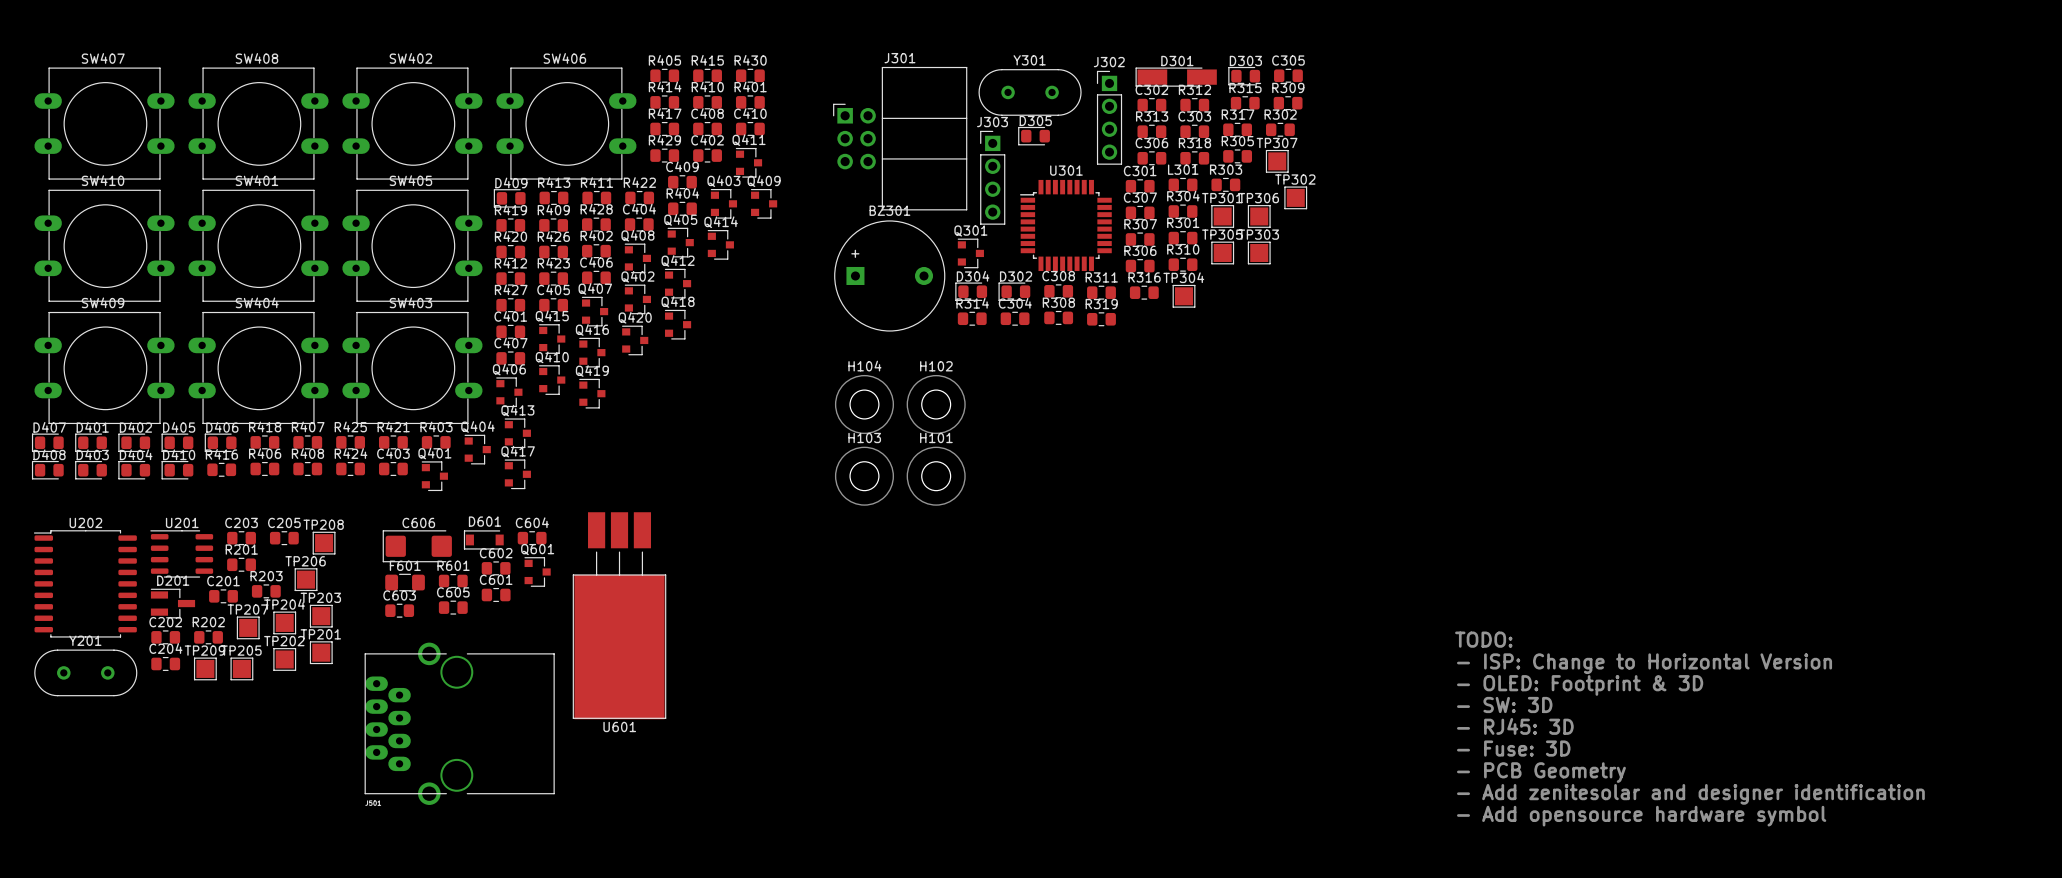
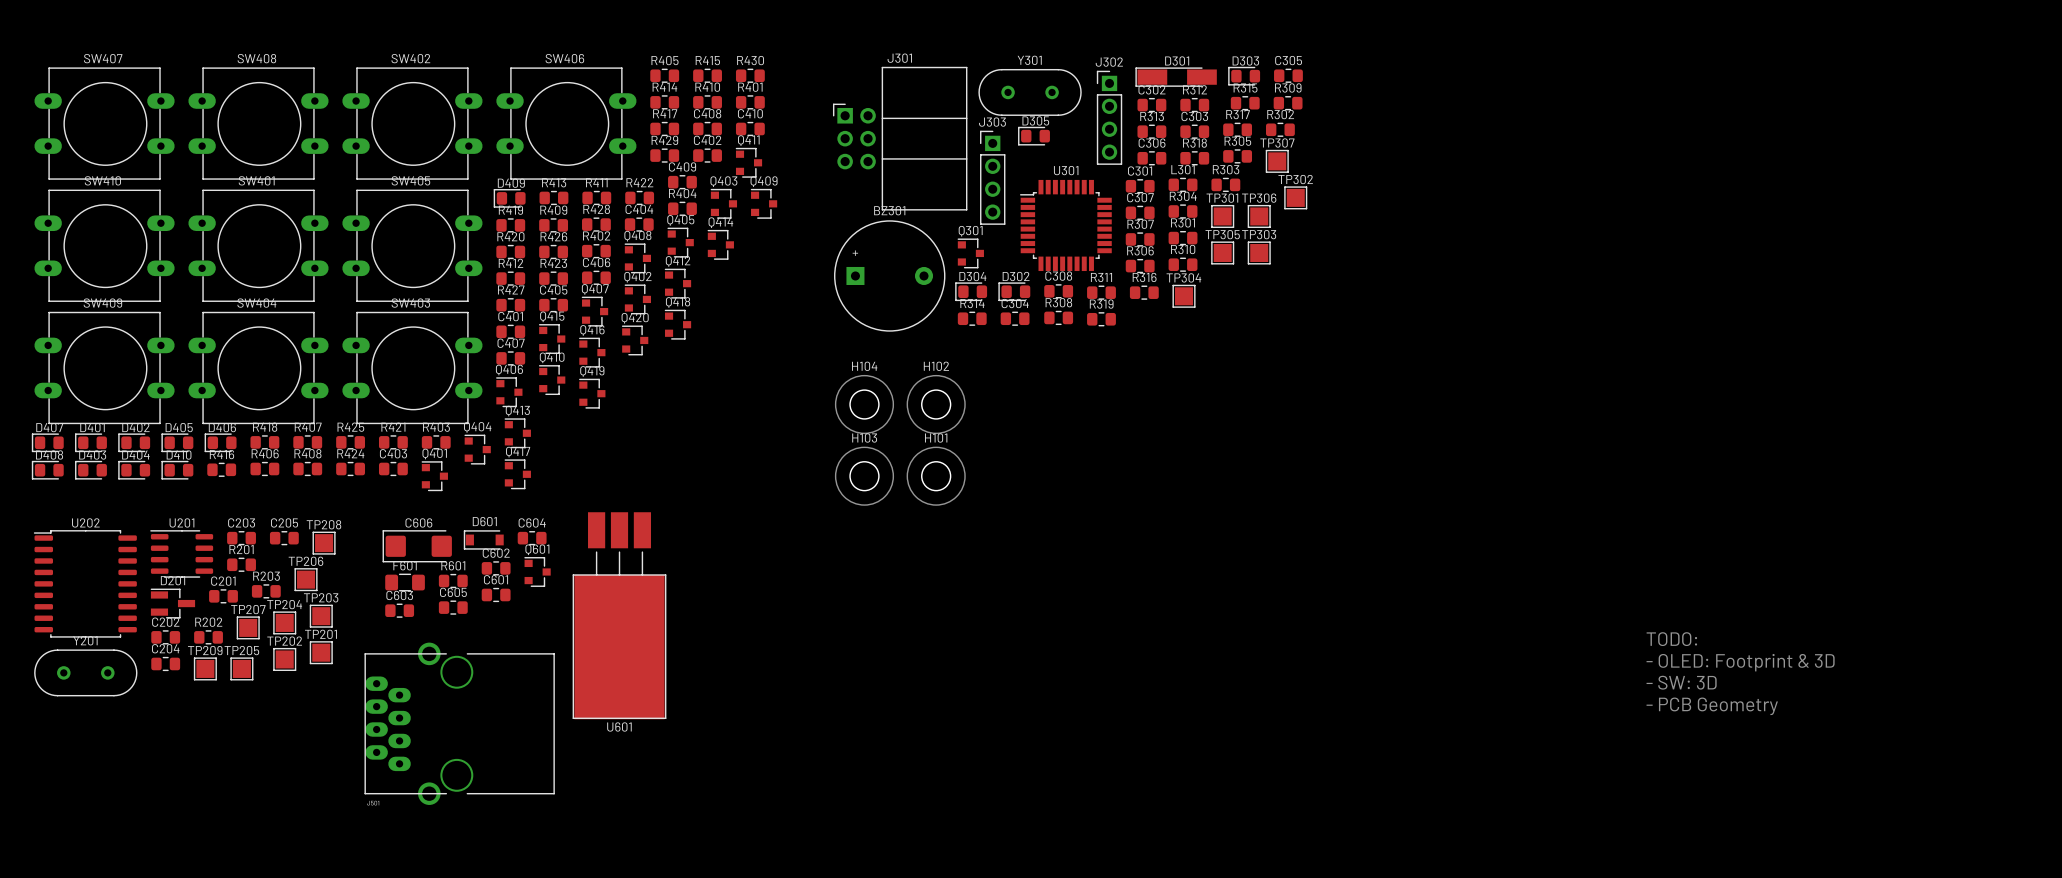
text position: TODO: (1483, 639) -> TODO: (1671, 639)
text: - ISP: Change to Horizontal Version (1644, 663) -> none
text position: - OLED: Footprint & 3D (1580, 685) -> - OLED: Footprint & 3D (1740, 662)
text position: - SW: 3D (1504, 704) -> - SW: 3D (1681, 682)
text: - RJ45: 3D (1515, 726) -> none
text: - Fuse: 3D (1513, 748) -> none
text position: - PCB Geometry (1541, 772) -> - PCB Geometry (1712, 706)
text: - Add zenitesolar and designer identification (1690, 794) -> none
text: - Add opensource hardware symbol (1641, 816) -> none

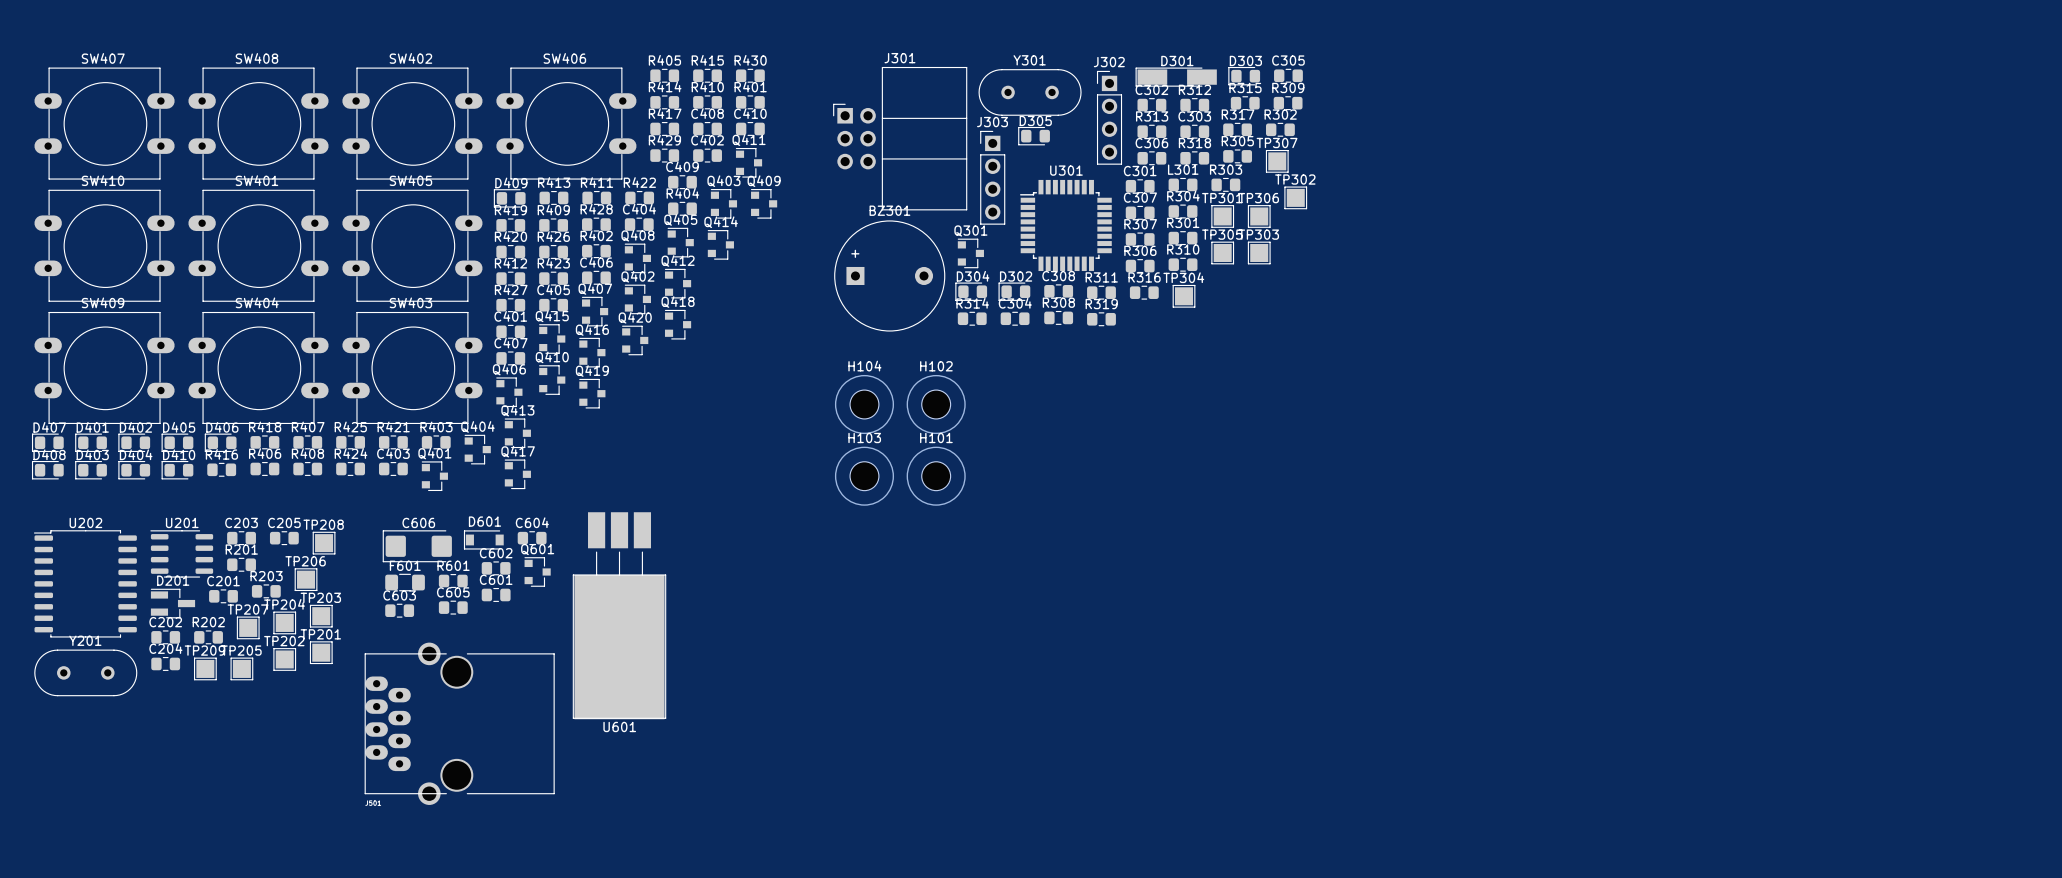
text: TODO: (1671, 639) -> none
text: - OLED: Footprint & 3D (1740, 662) -> none
text: - SW: 3D (1681, 682) -> none
text: - PCB Geometry (1712, 706) -> none

